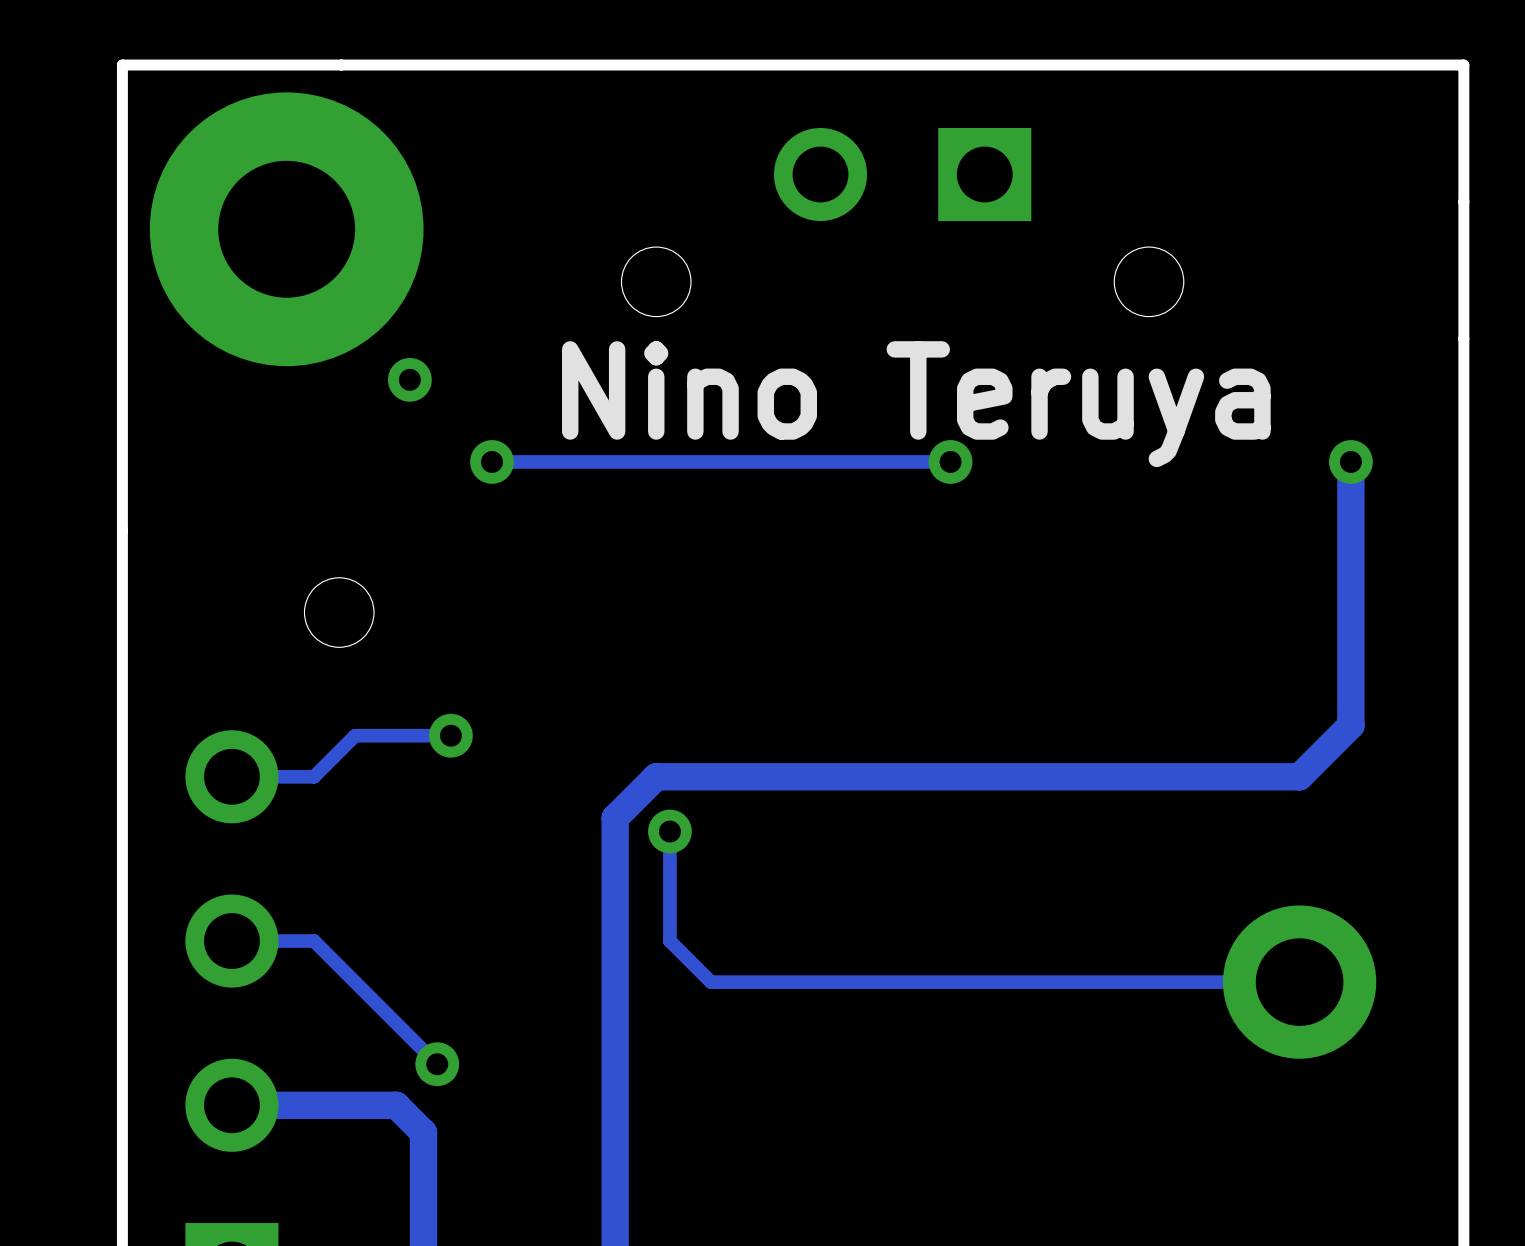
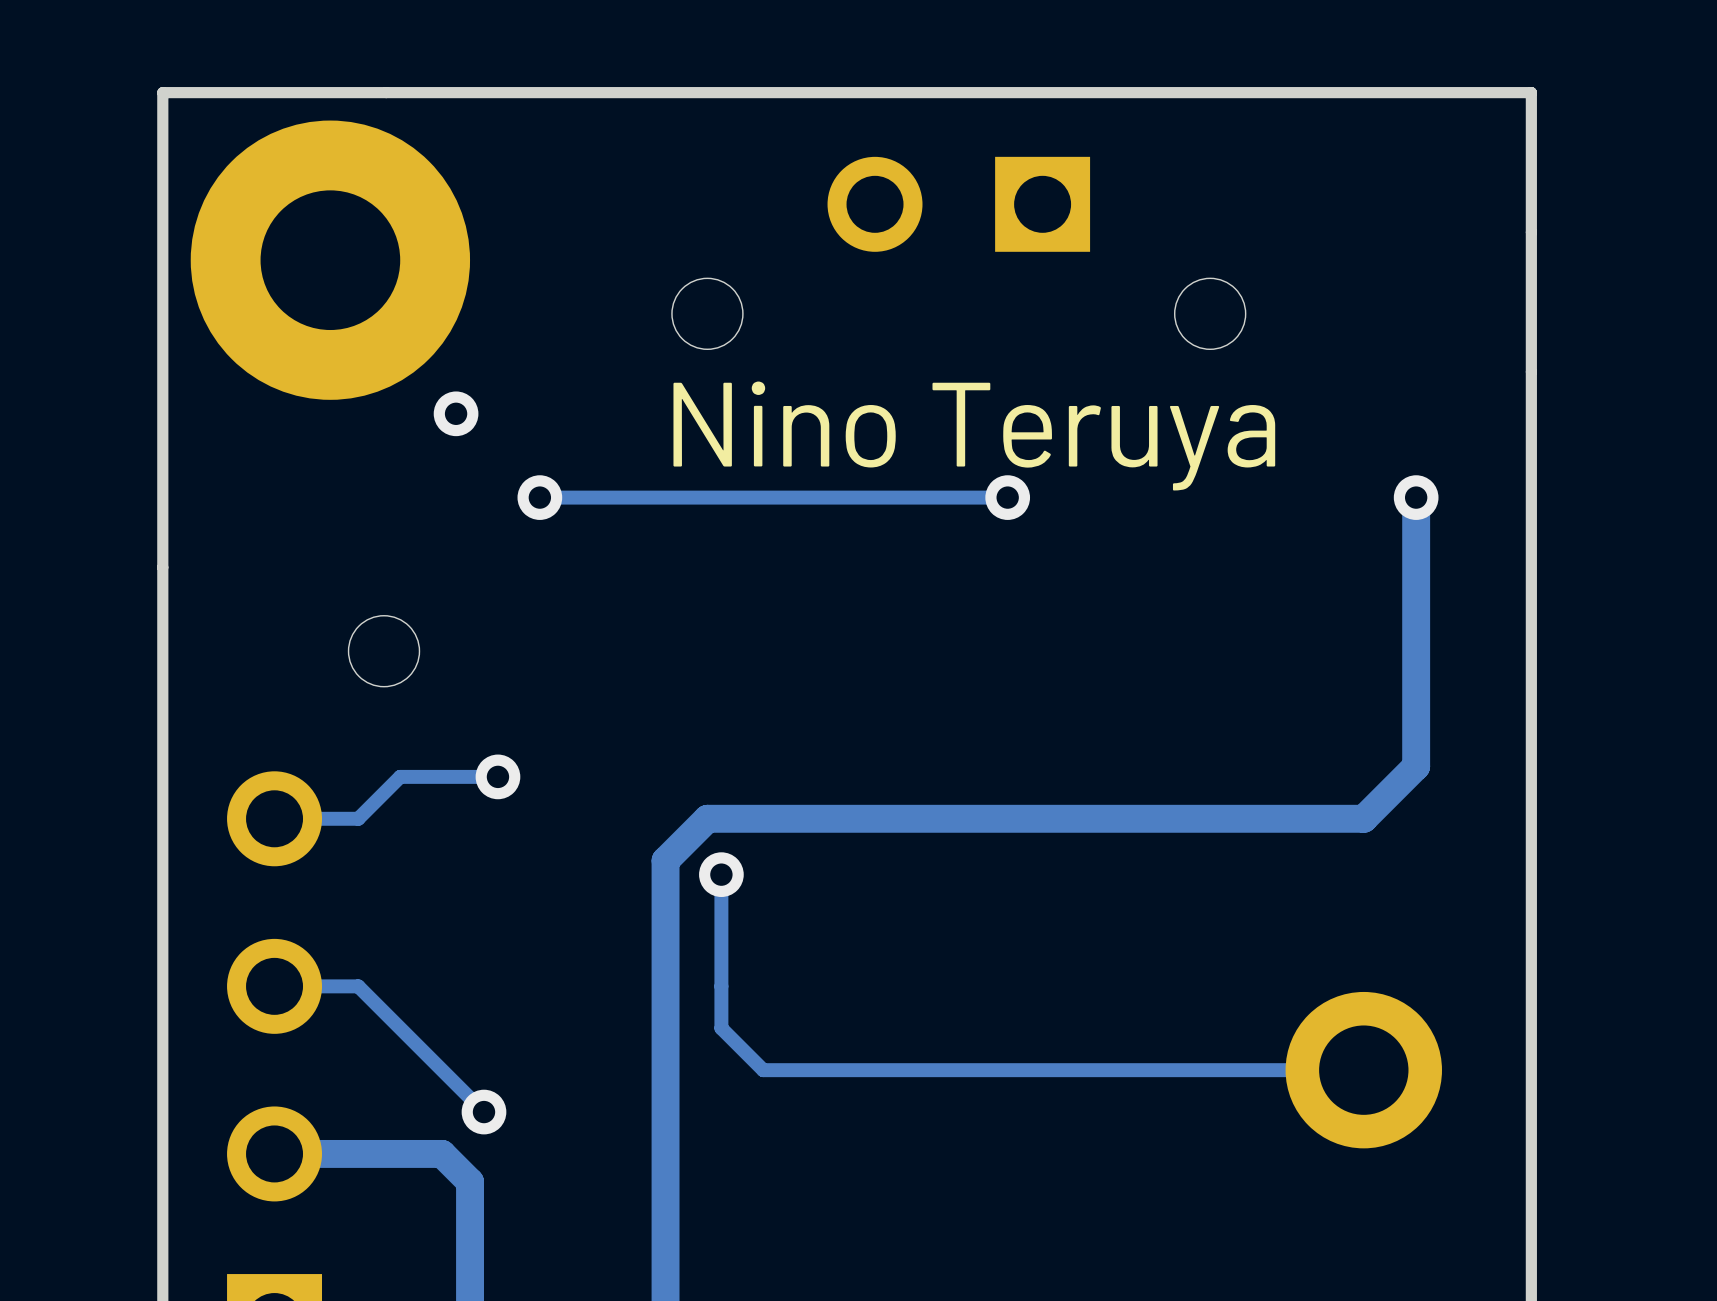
track: (669, 941) (711, 982) (1299, 982) -> (721, 986) (721, 1028) (763, 1070) (1363, 1070)
part position: (1299, 982) -> (1363, 1070)

